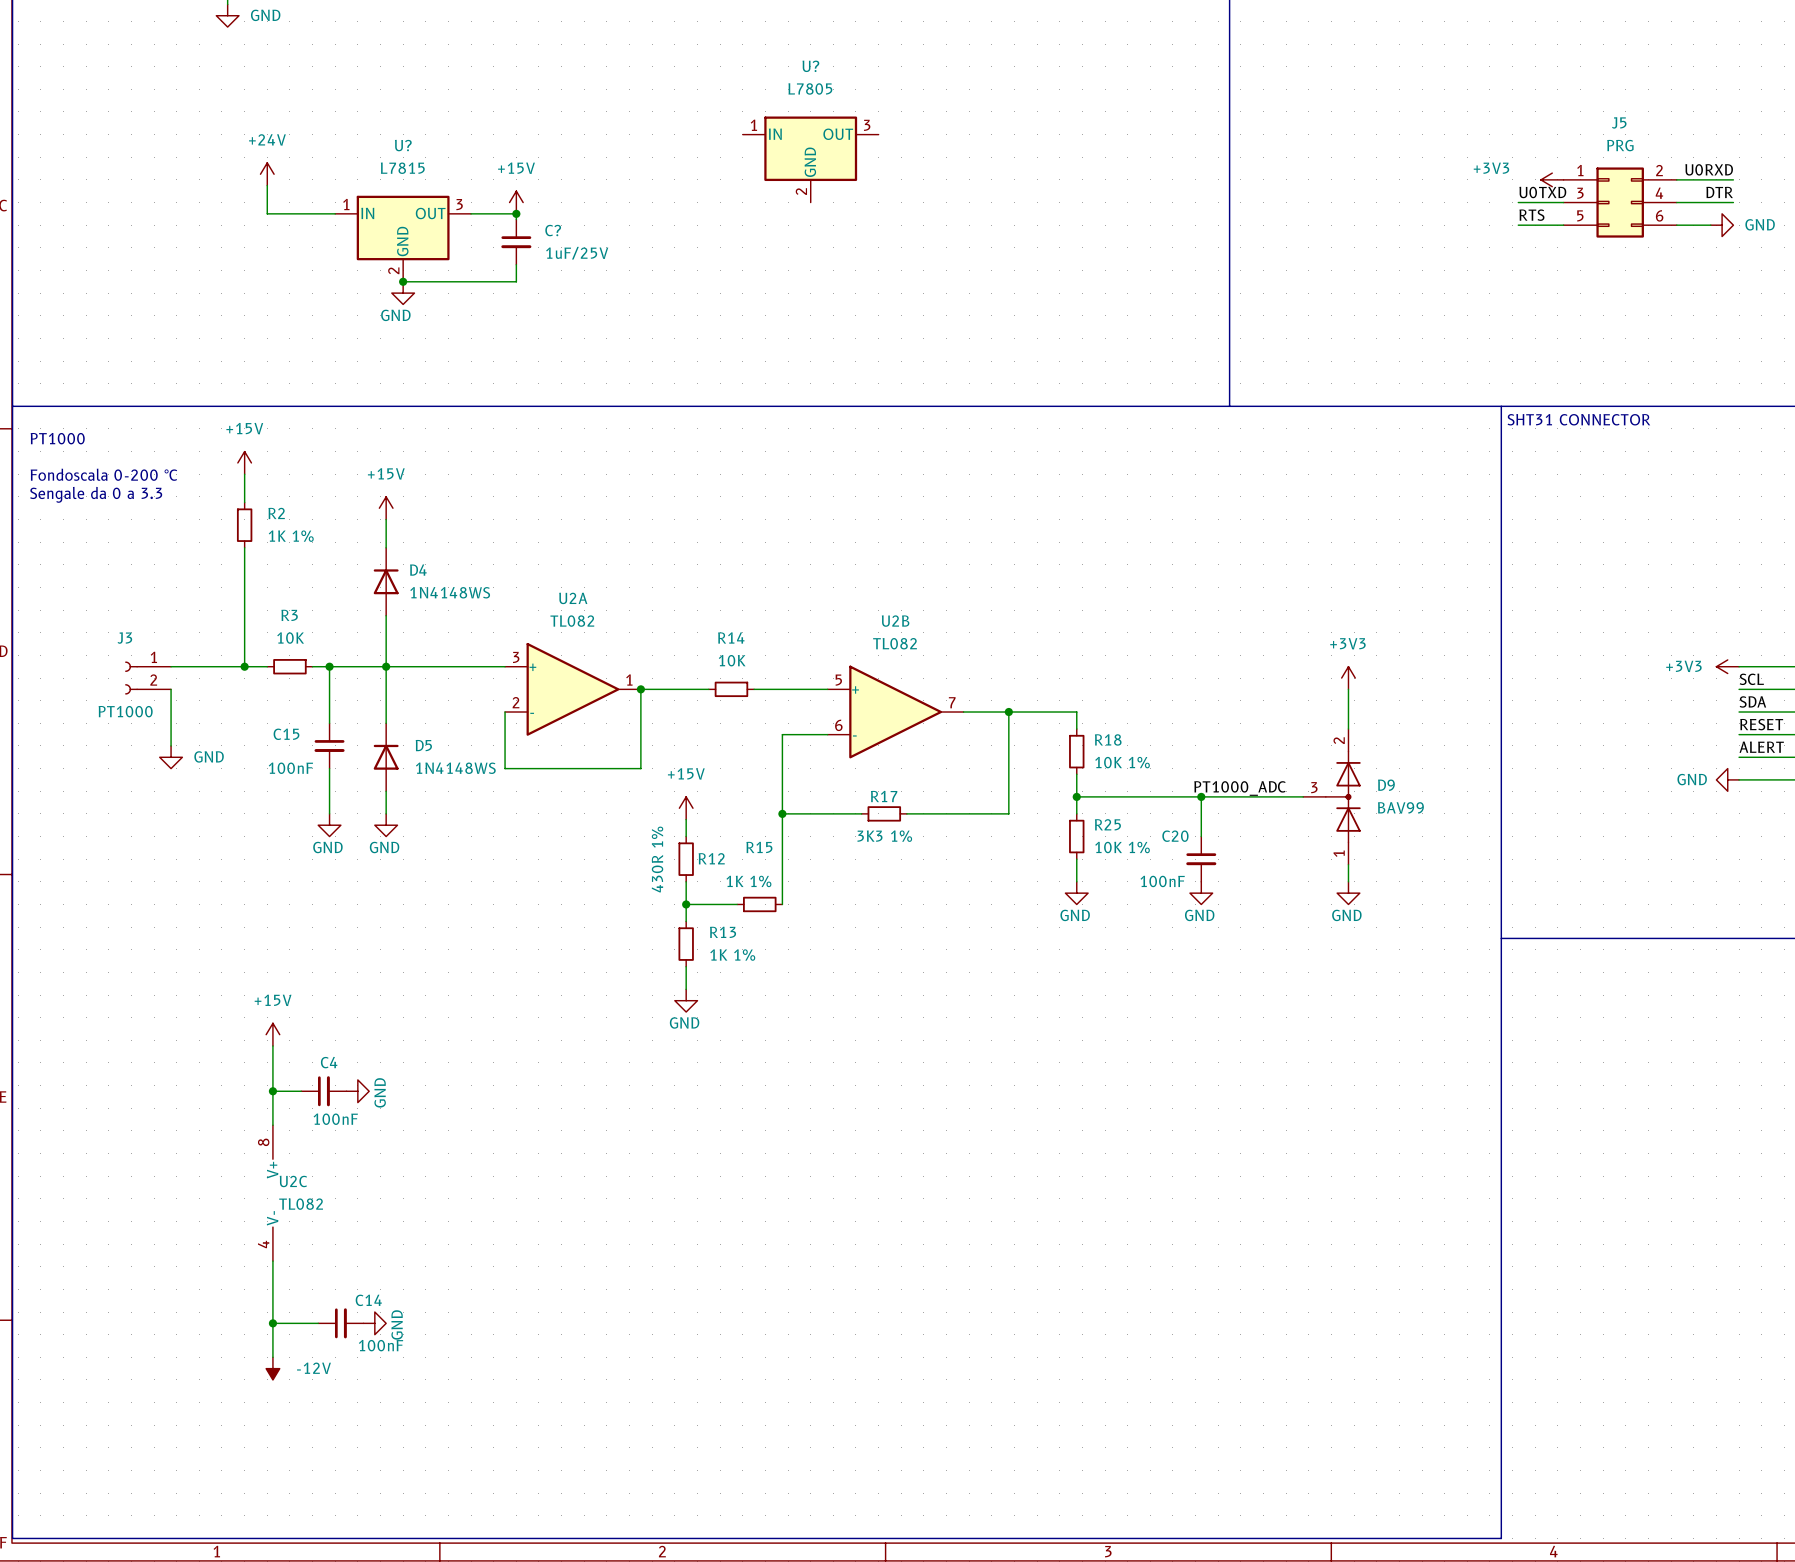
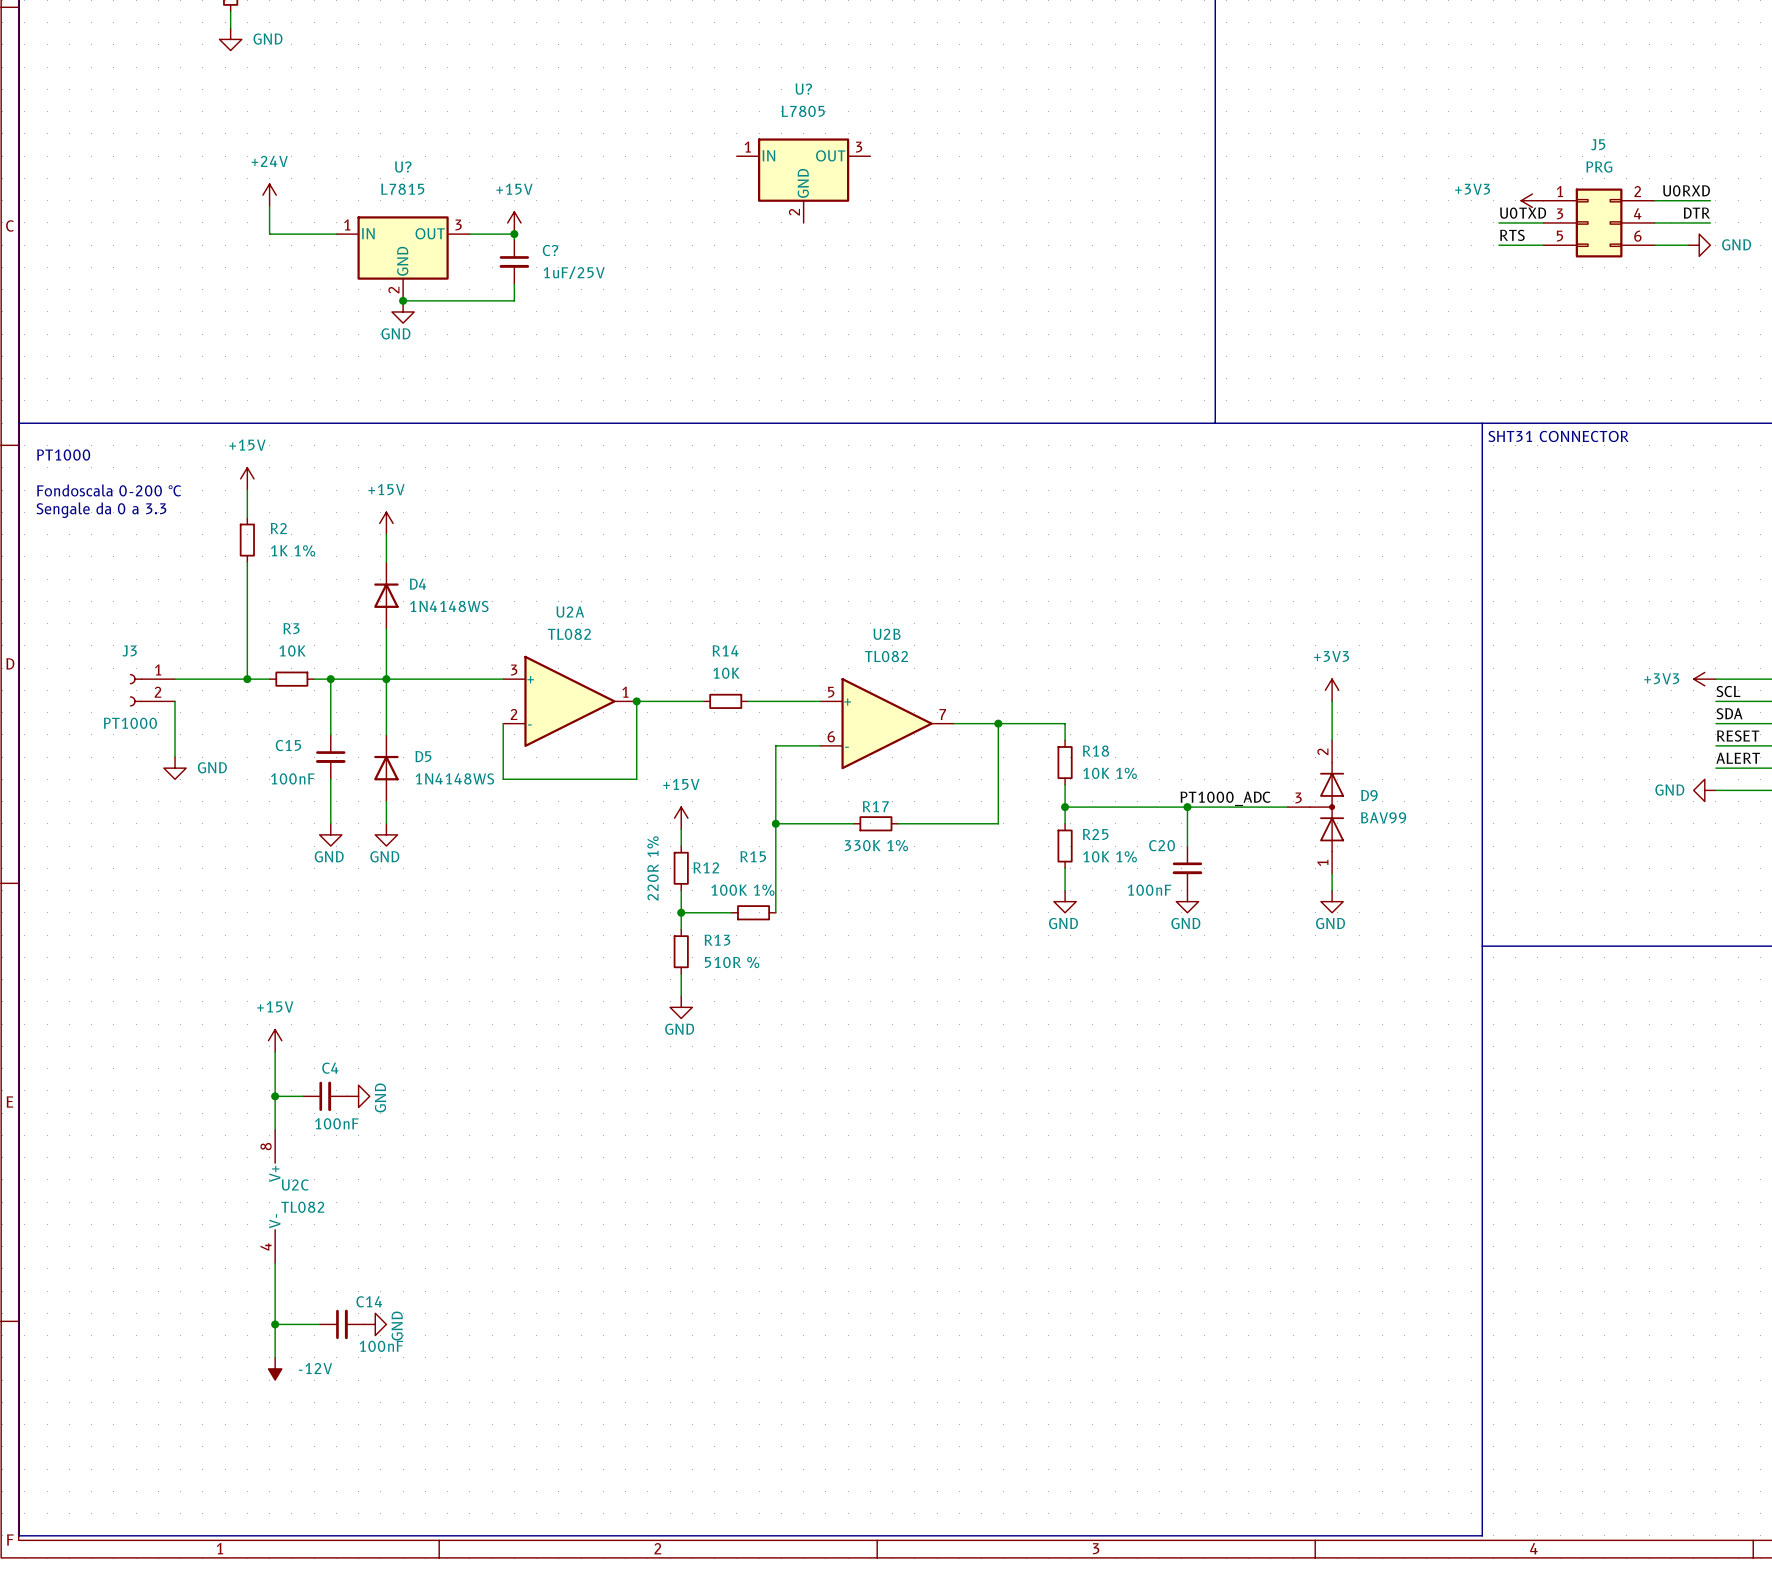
R17 value: 3K3 1% (884, 836) -> 330K 1% (876, 845)
R12 value: 430R 1% (657, 859) -> 220R 1% (653, 868)
R15 value: 1K 1% (748, 881) -> 100K 1% (742, 890)
R13 value: 1K 1% (732, 955) -> 510R % (732, 962)

